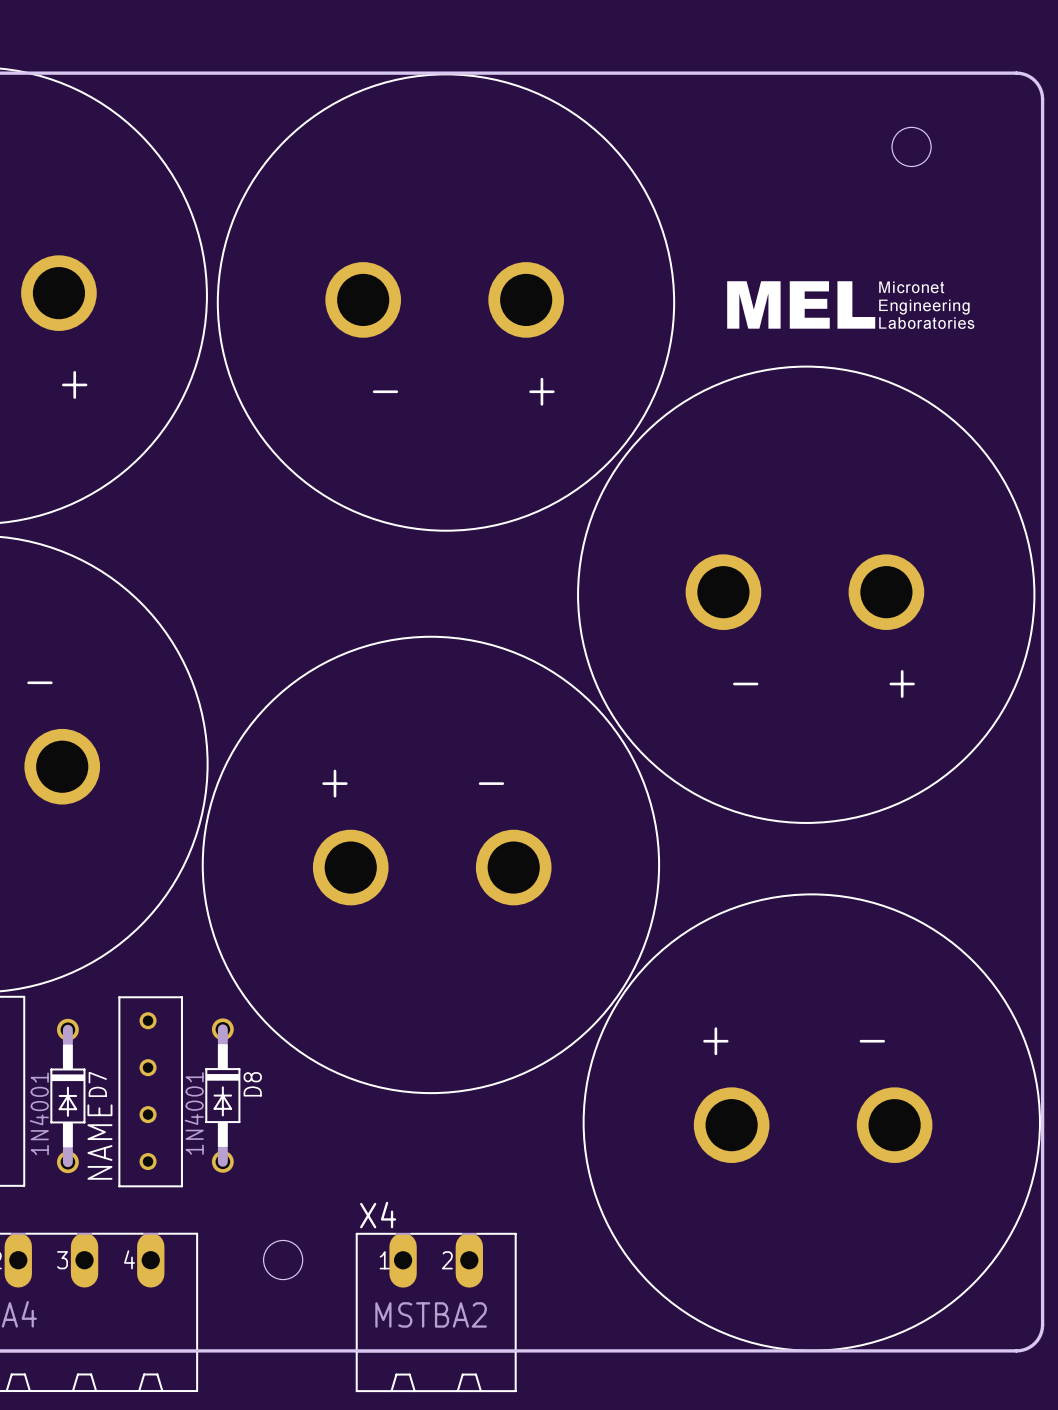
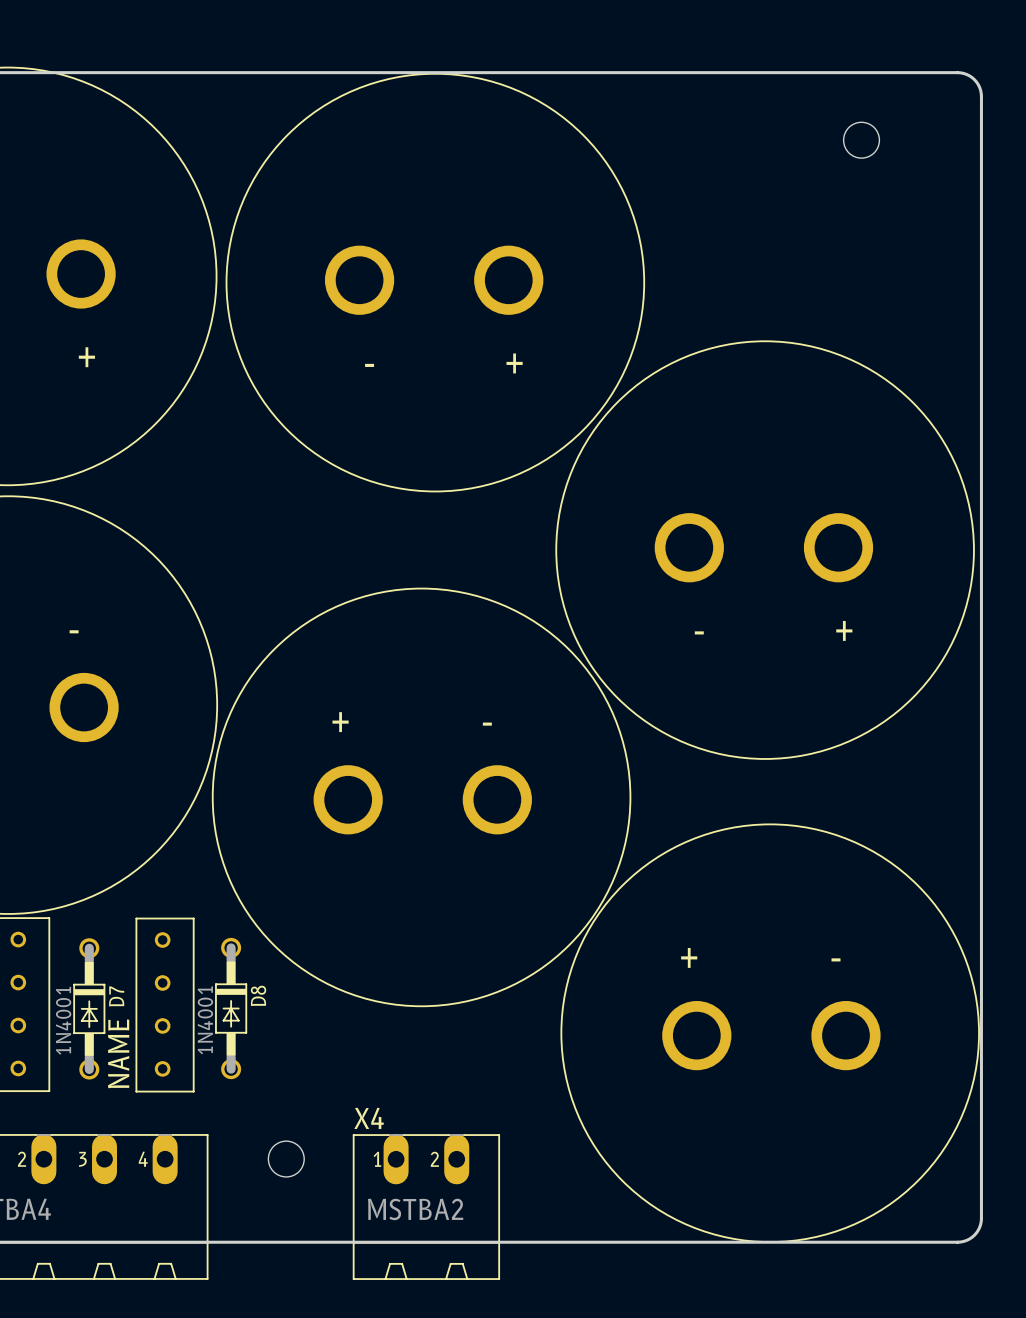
drawing: [727, 281, 975, 329] -> none

